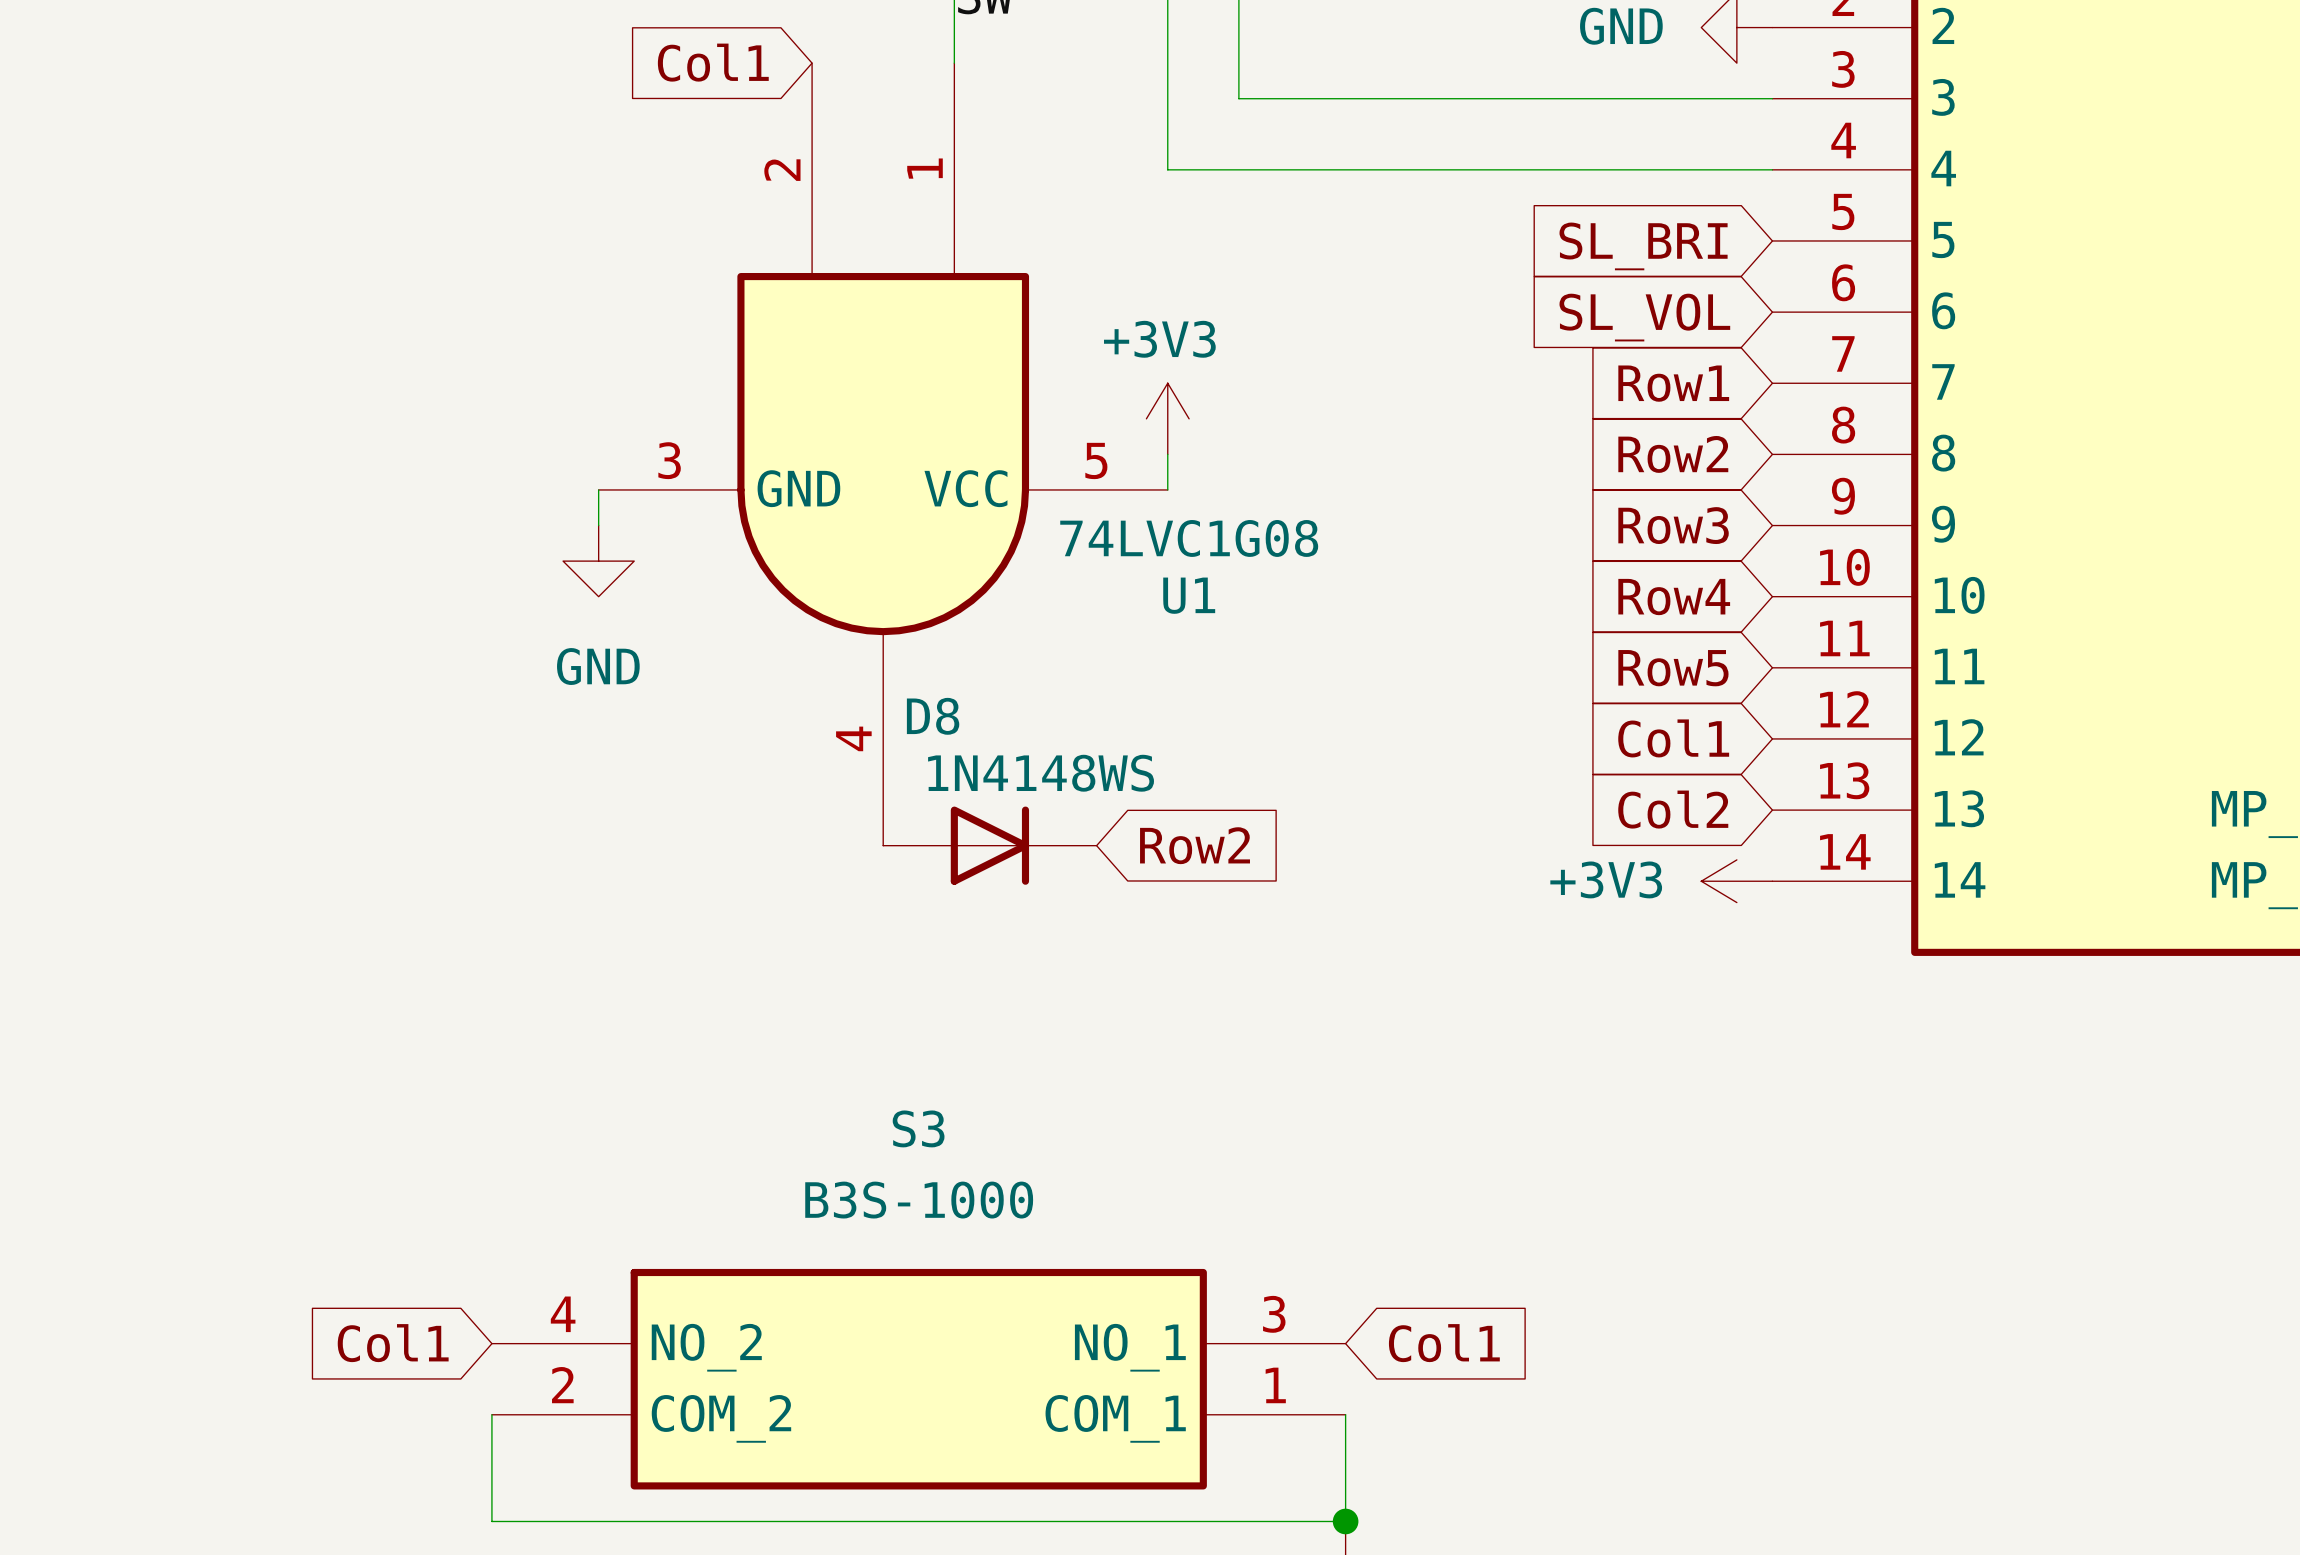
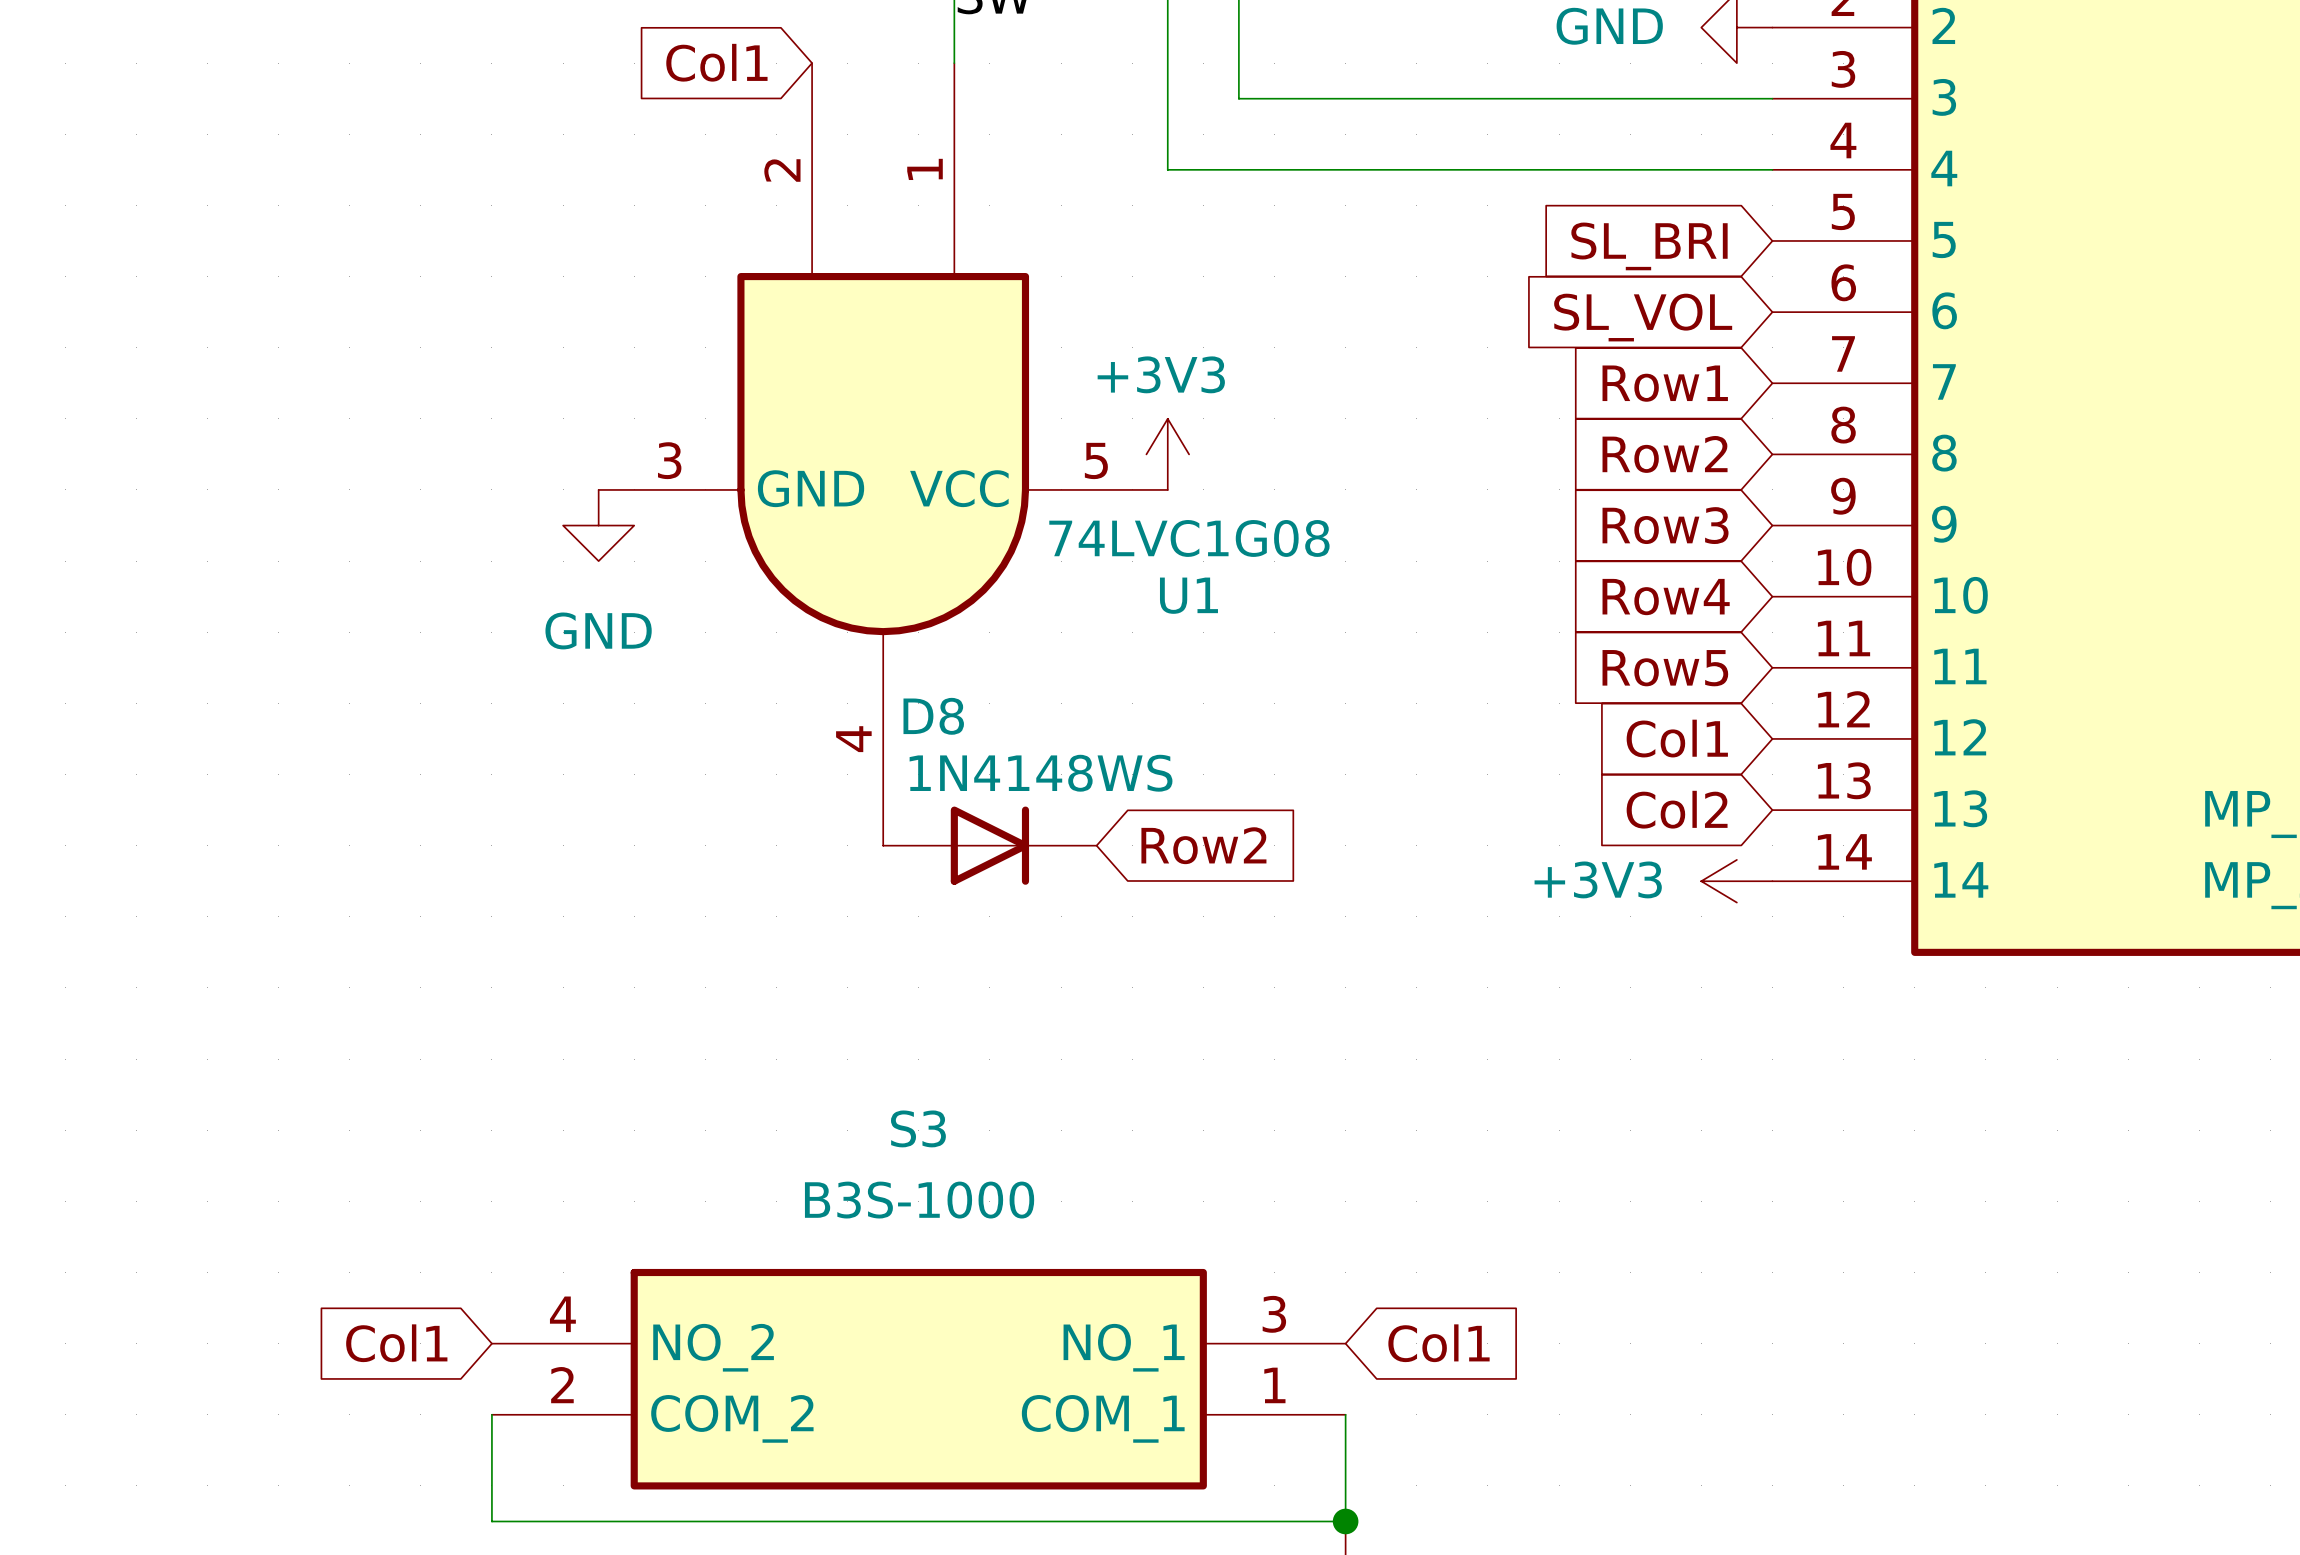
power symbol position: +3V3 (1167, 418) -> +3V3 (1167, 454)
power symbol position: GND (598, 561) -> GND (598, 525)

